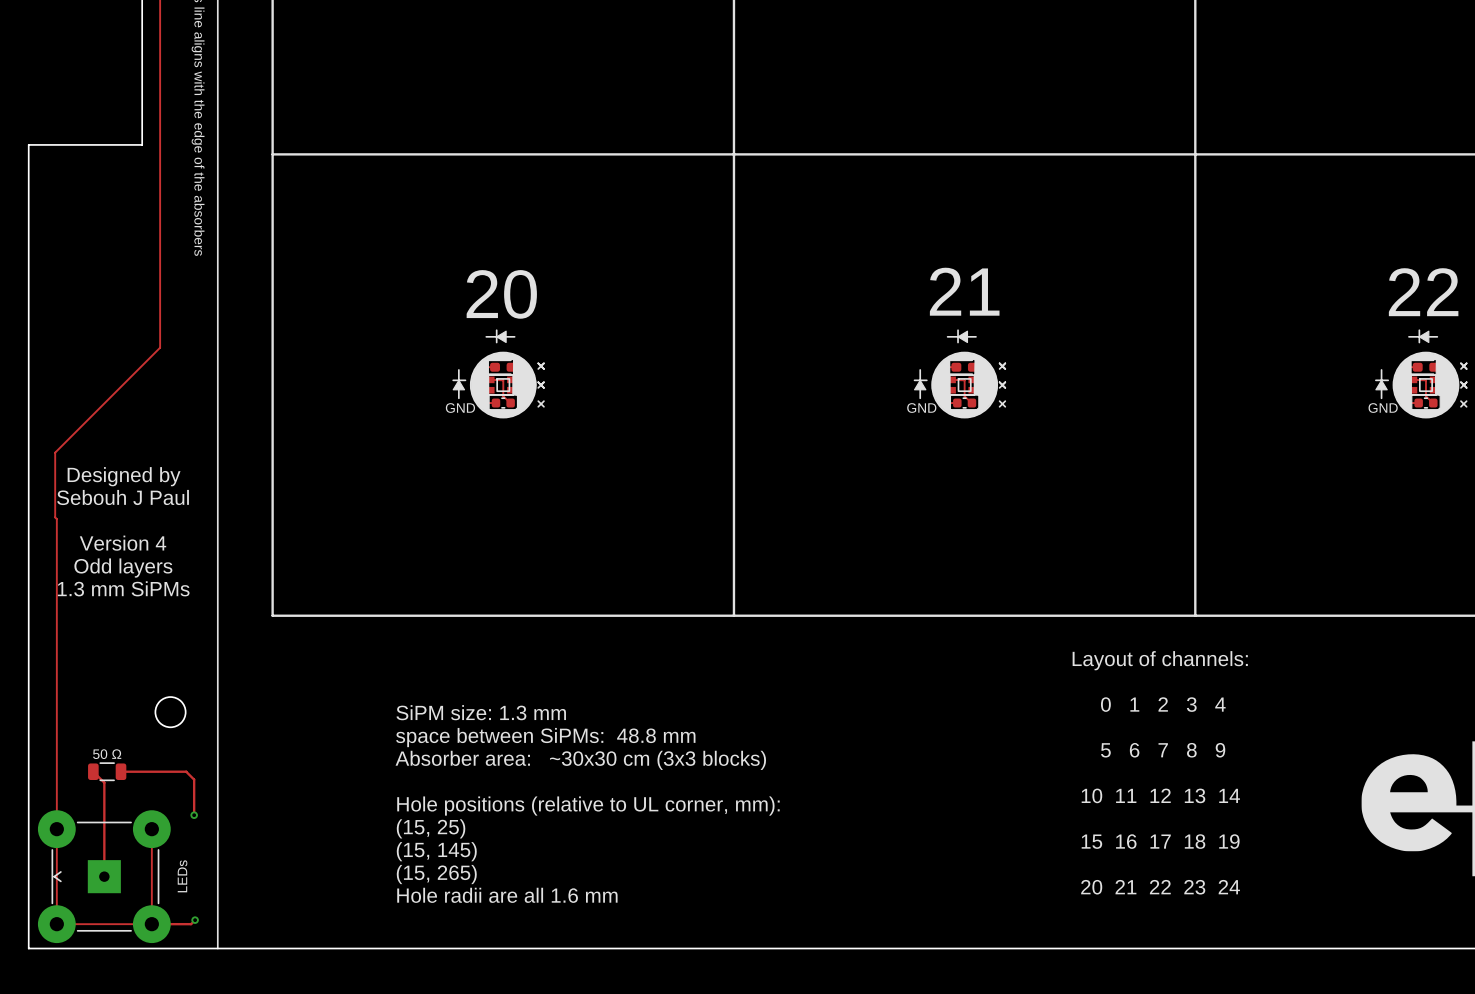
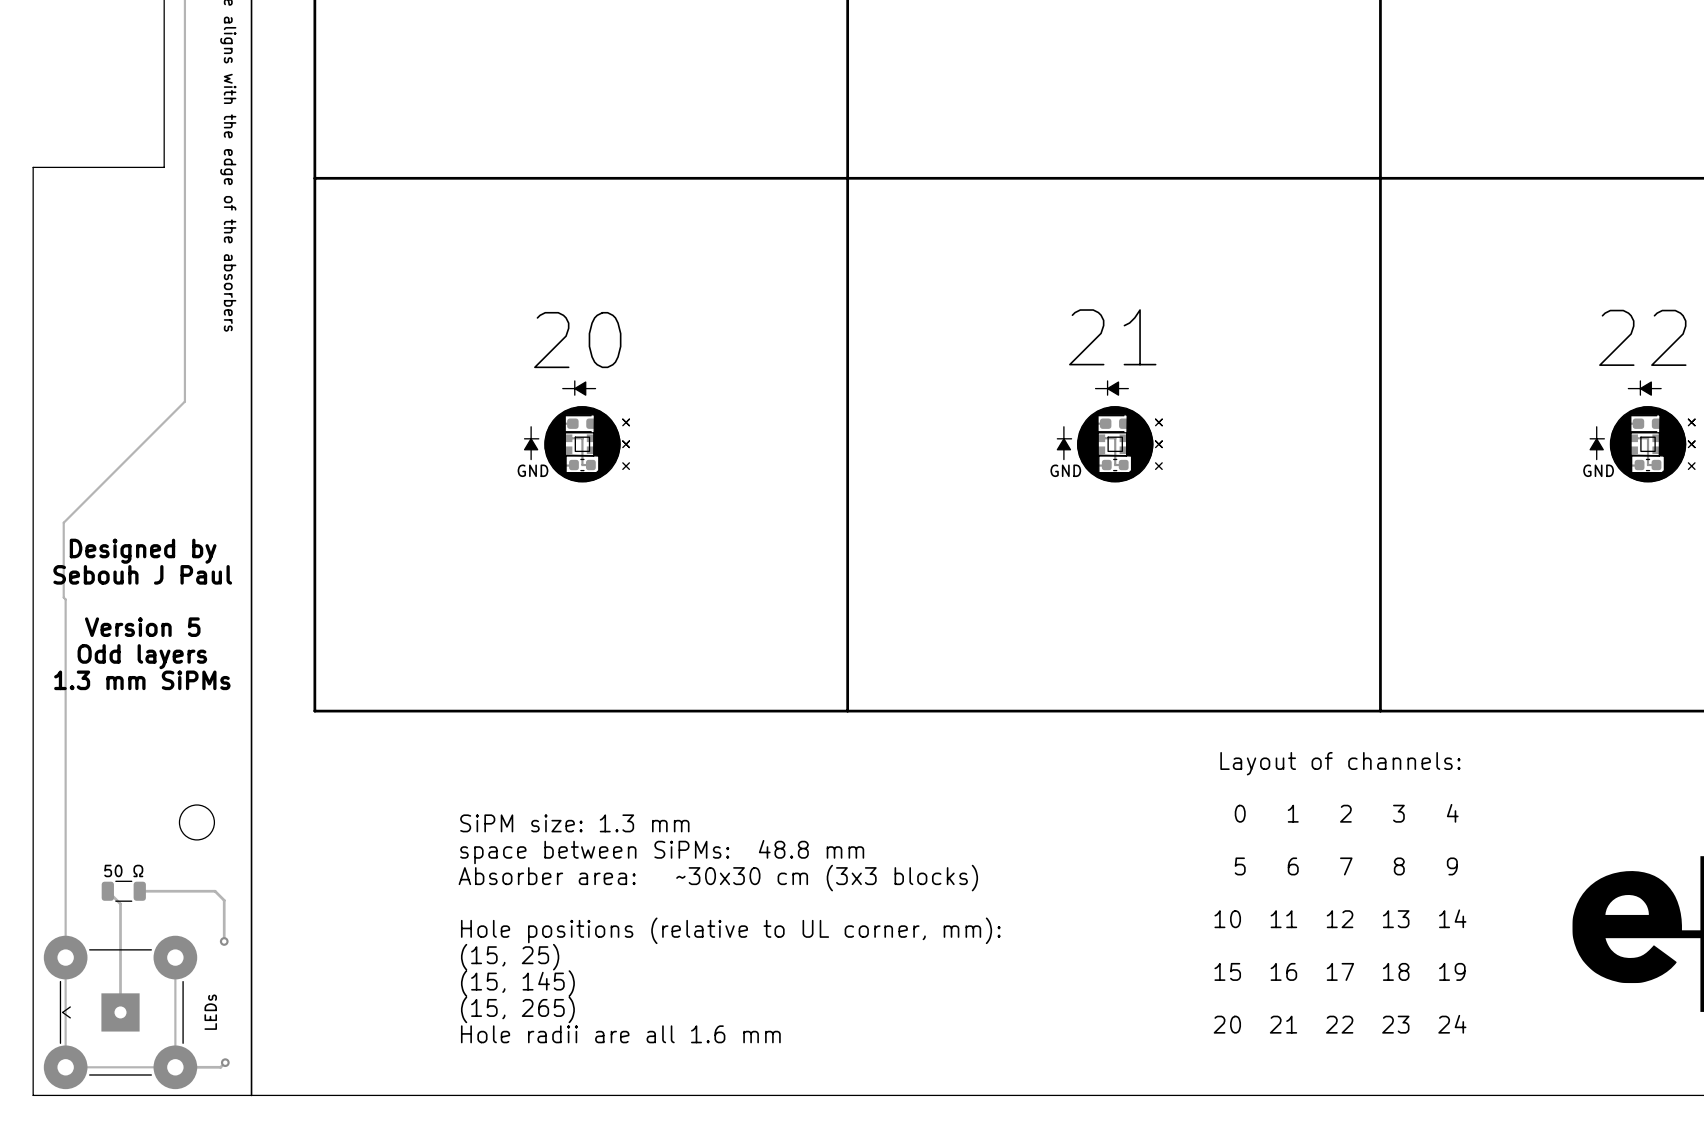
part footprint: [452, 329, 545, 419] -> [523, 380, 631, 483]
part footprint: [913, 329, 1006, 419] -> [1056, 380, 1163, 483]
part footprint: [1375, 329, 1468, 419] -> [1589, 380, 1696, 483]
text: Version 4 (123, 543) -> Version 5 (142, 627)

